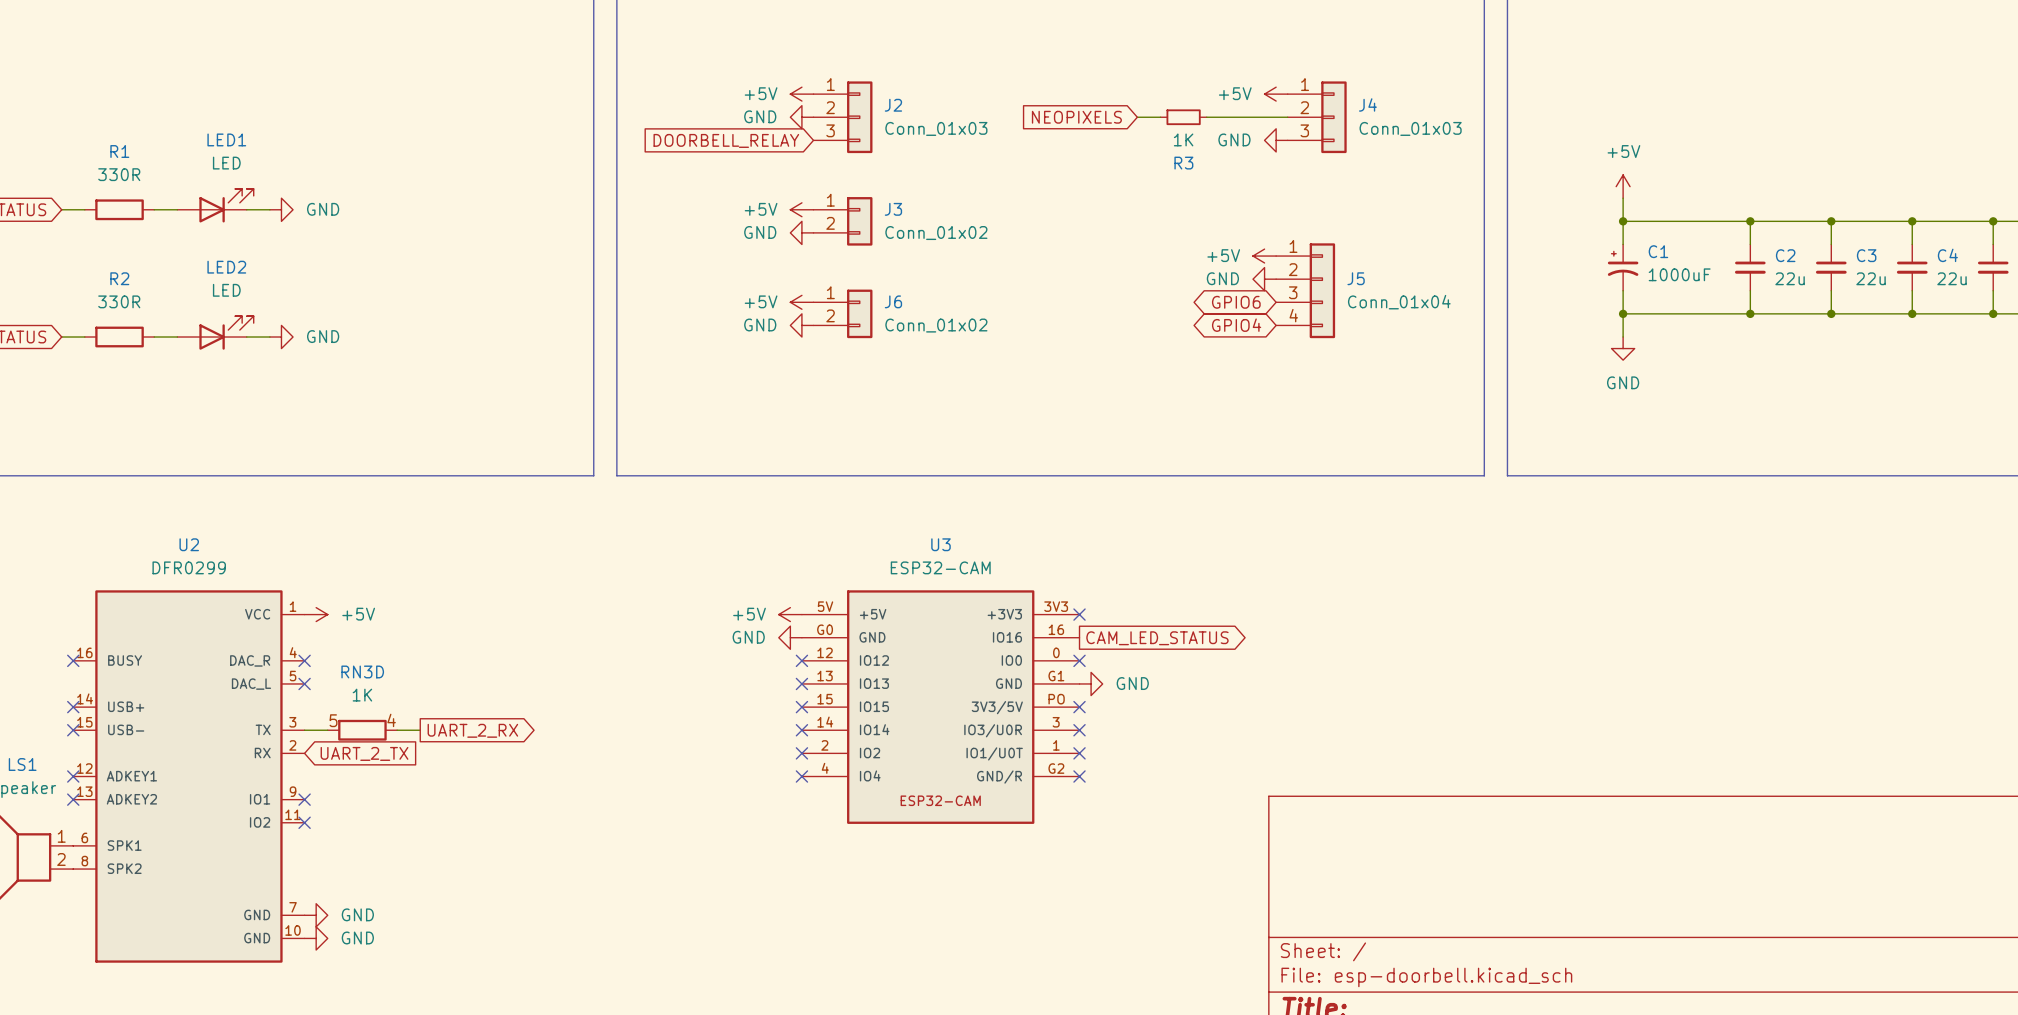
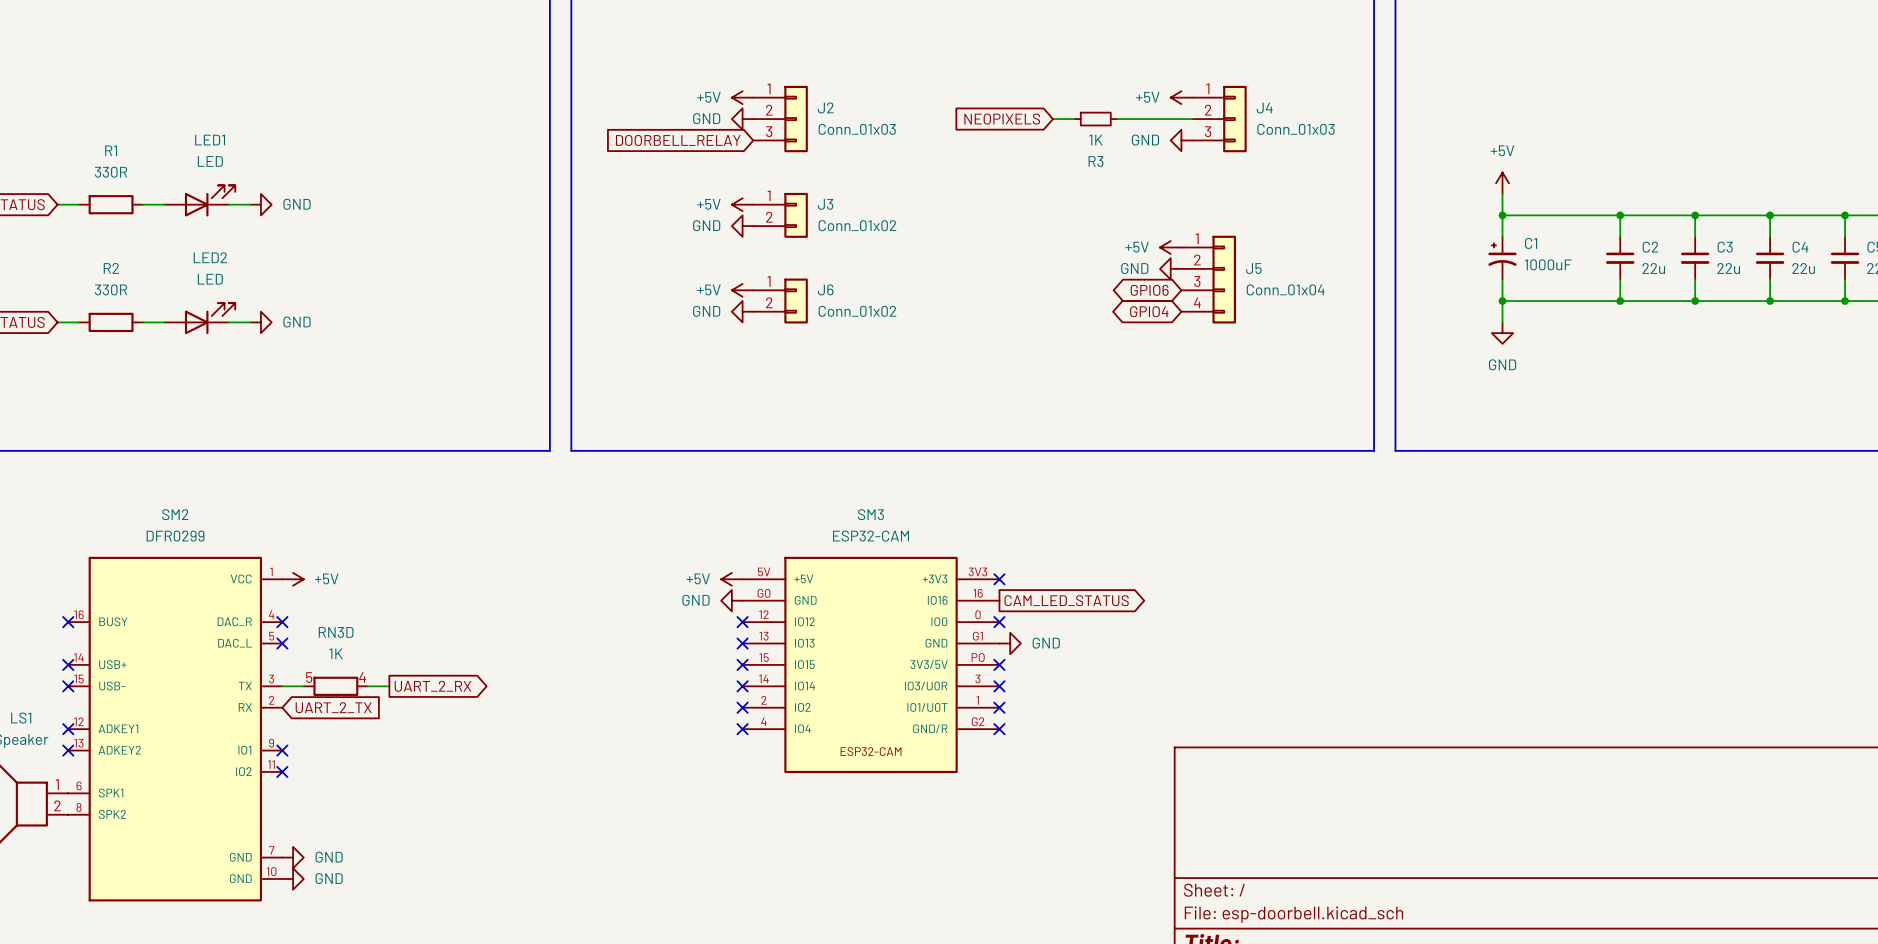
U2 name: U2 (189, 544) -> SM2 (175, 514)
U3 name: U3 (940, 544) -> SM3 (870, 514)

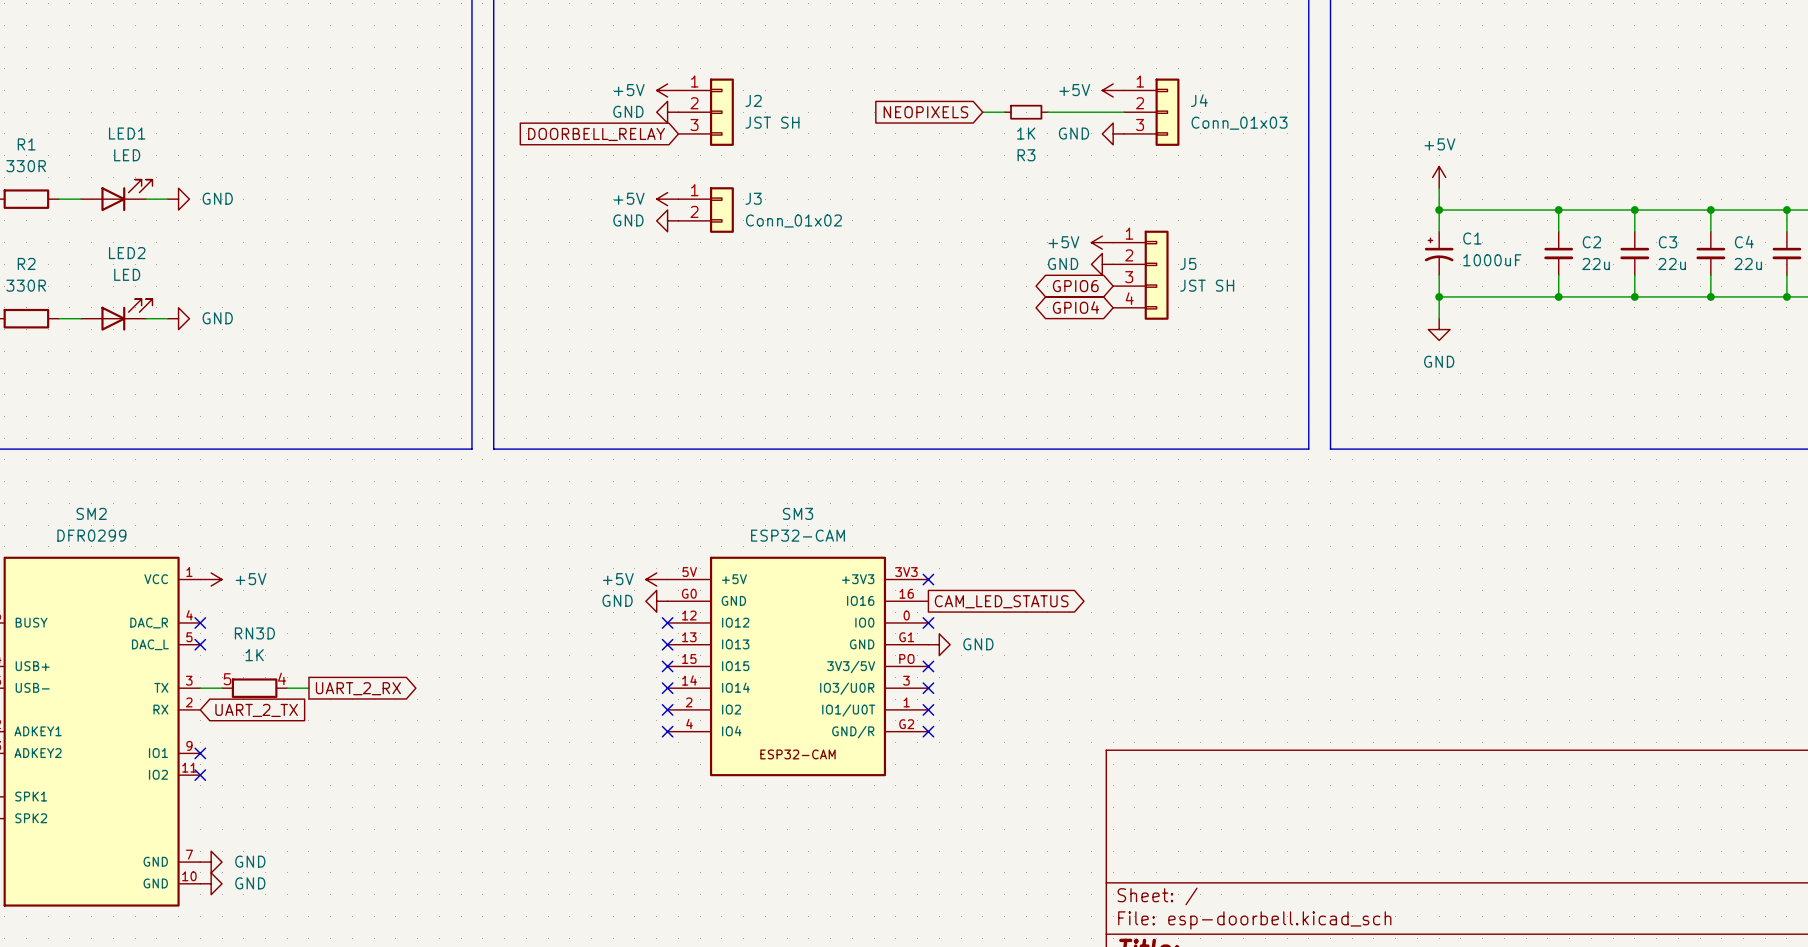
J2 value: Conn_01x03 (857, 129) -> JST SH (772, 122)
J5 value: Conn_01x04 (1285, 289) -> JST SH (1207, 285)
power symbol: +5V (742, 290) -> none
J6: Conn_01x02 (780, 301) -> none
power symbol: GND (742, 311) -> none

